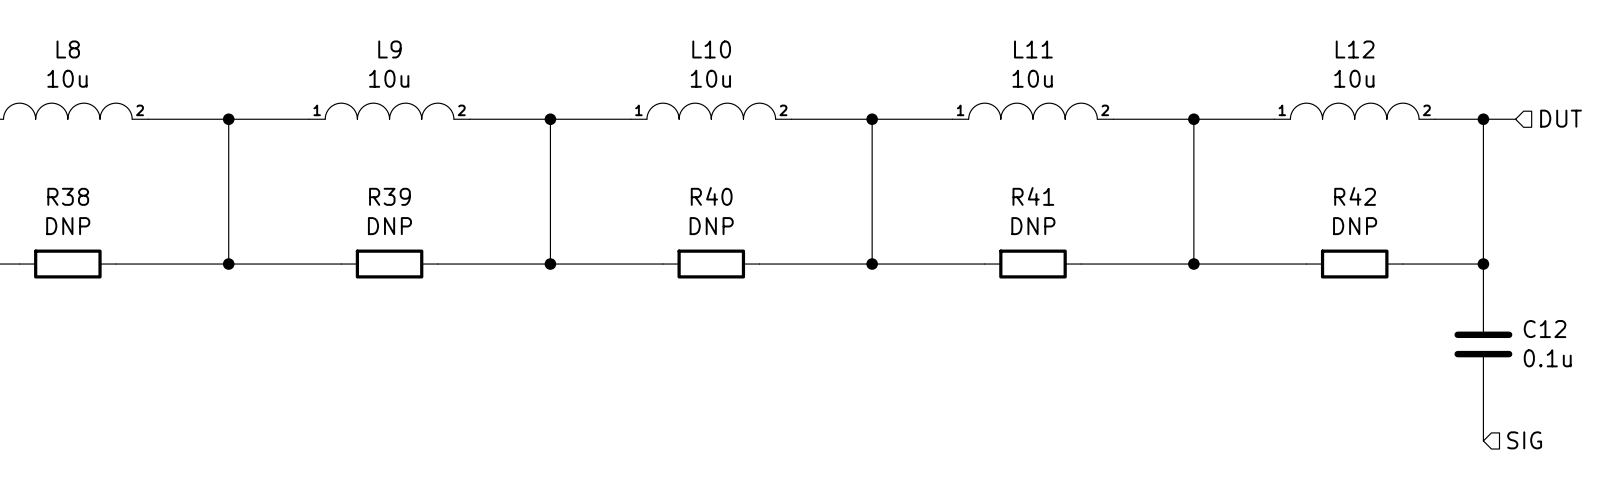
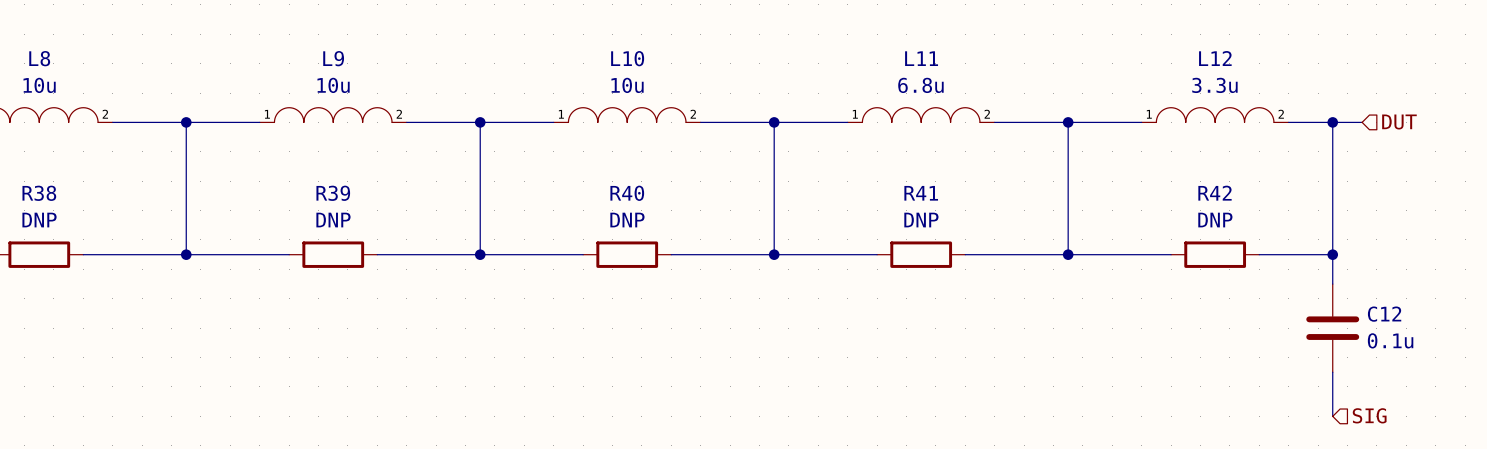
L11 value: 10u (1032, 78) -> 6.8u (920, 85)
L12 value: 10u (1354, 78) -> 3.3u (1214, 85)

